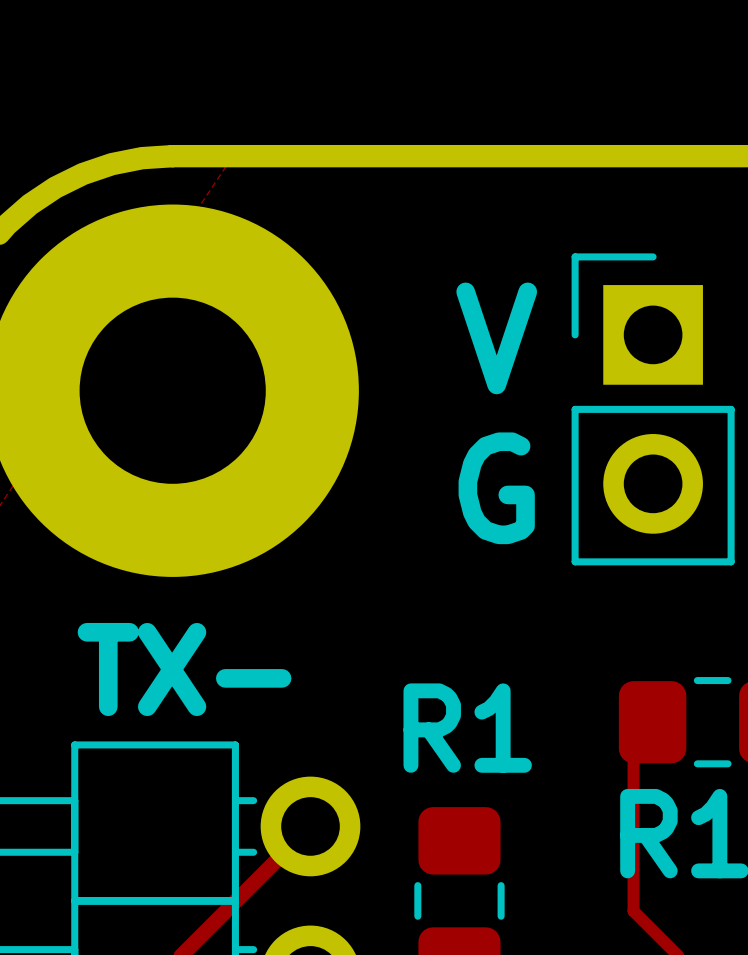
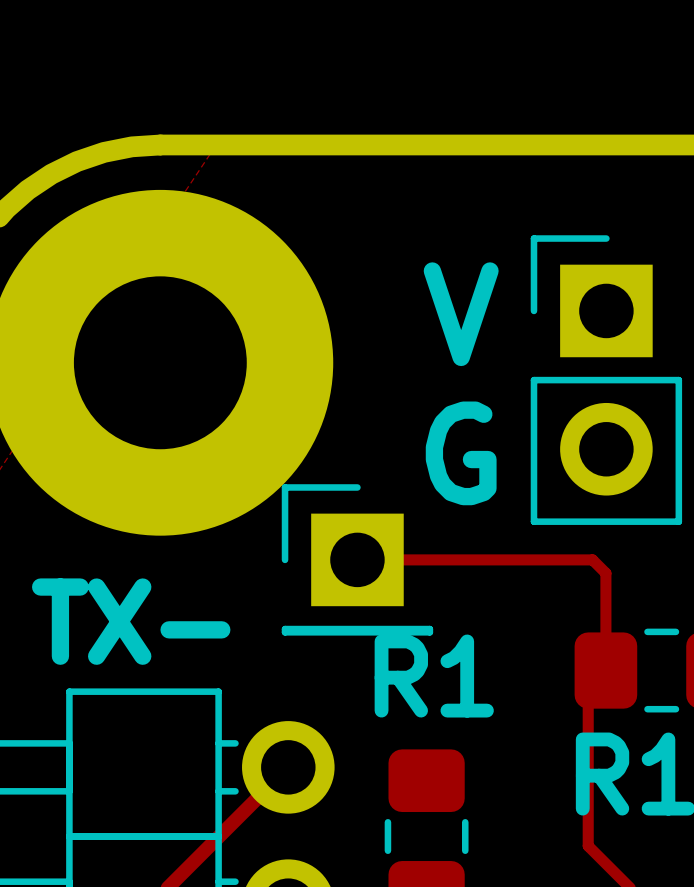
track: none -> (357, 559) (592, 559) (605, 573) (605, 670)
part: none -> (357, 559)
text position: TX- (184, 669) -> TX- (131, 621)

